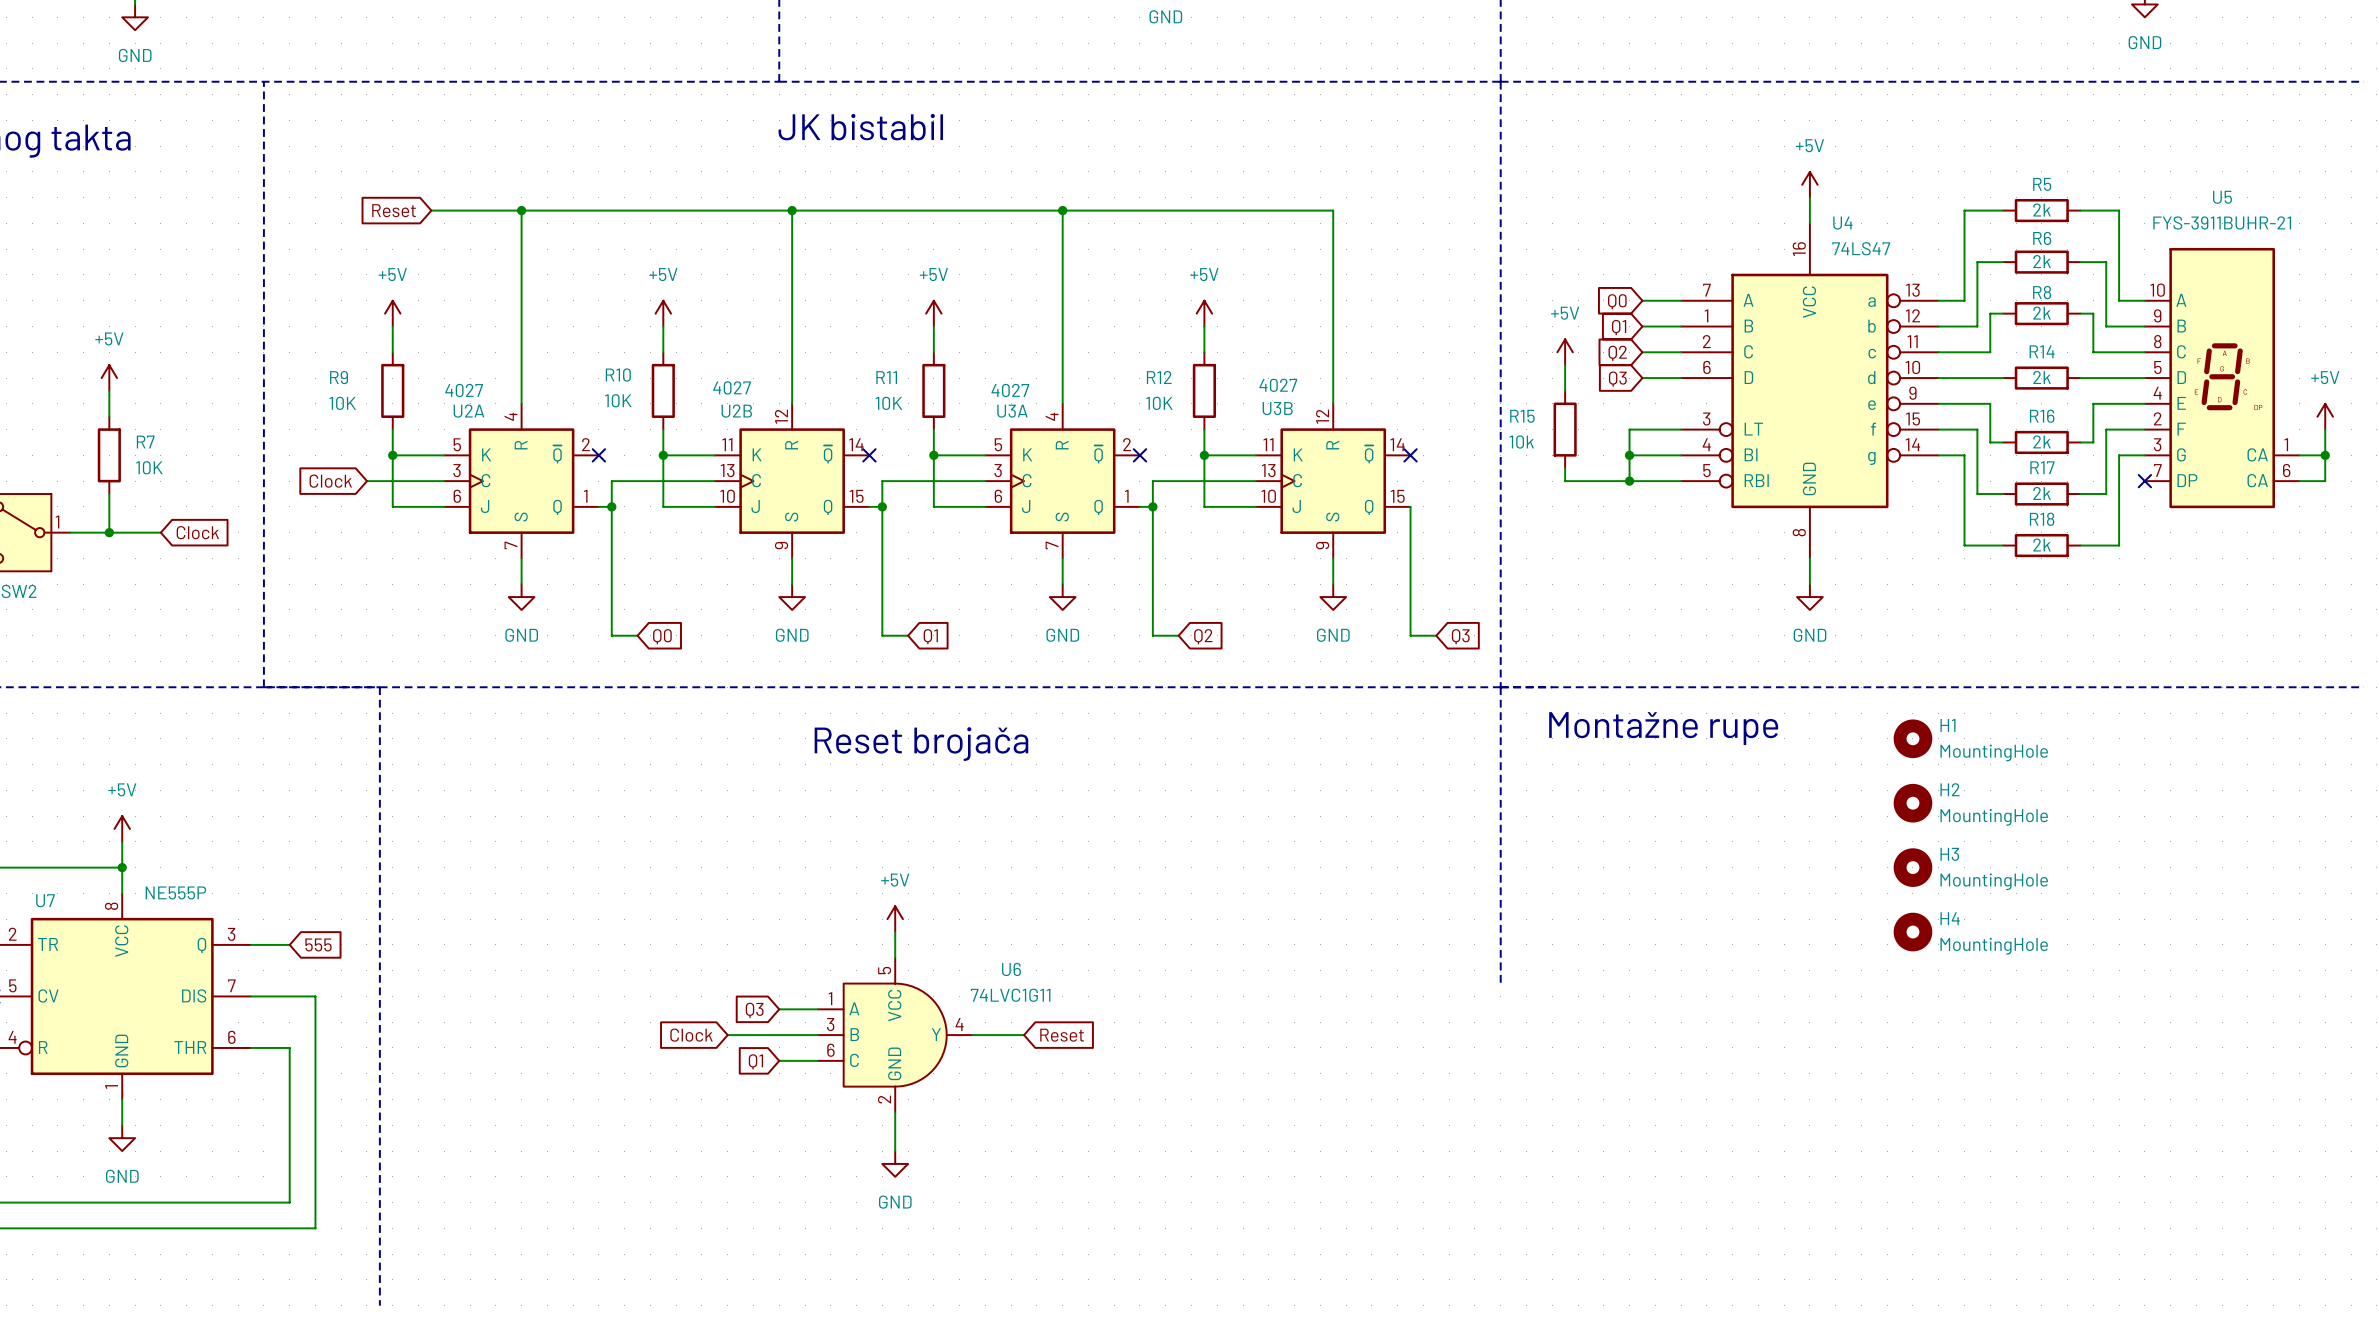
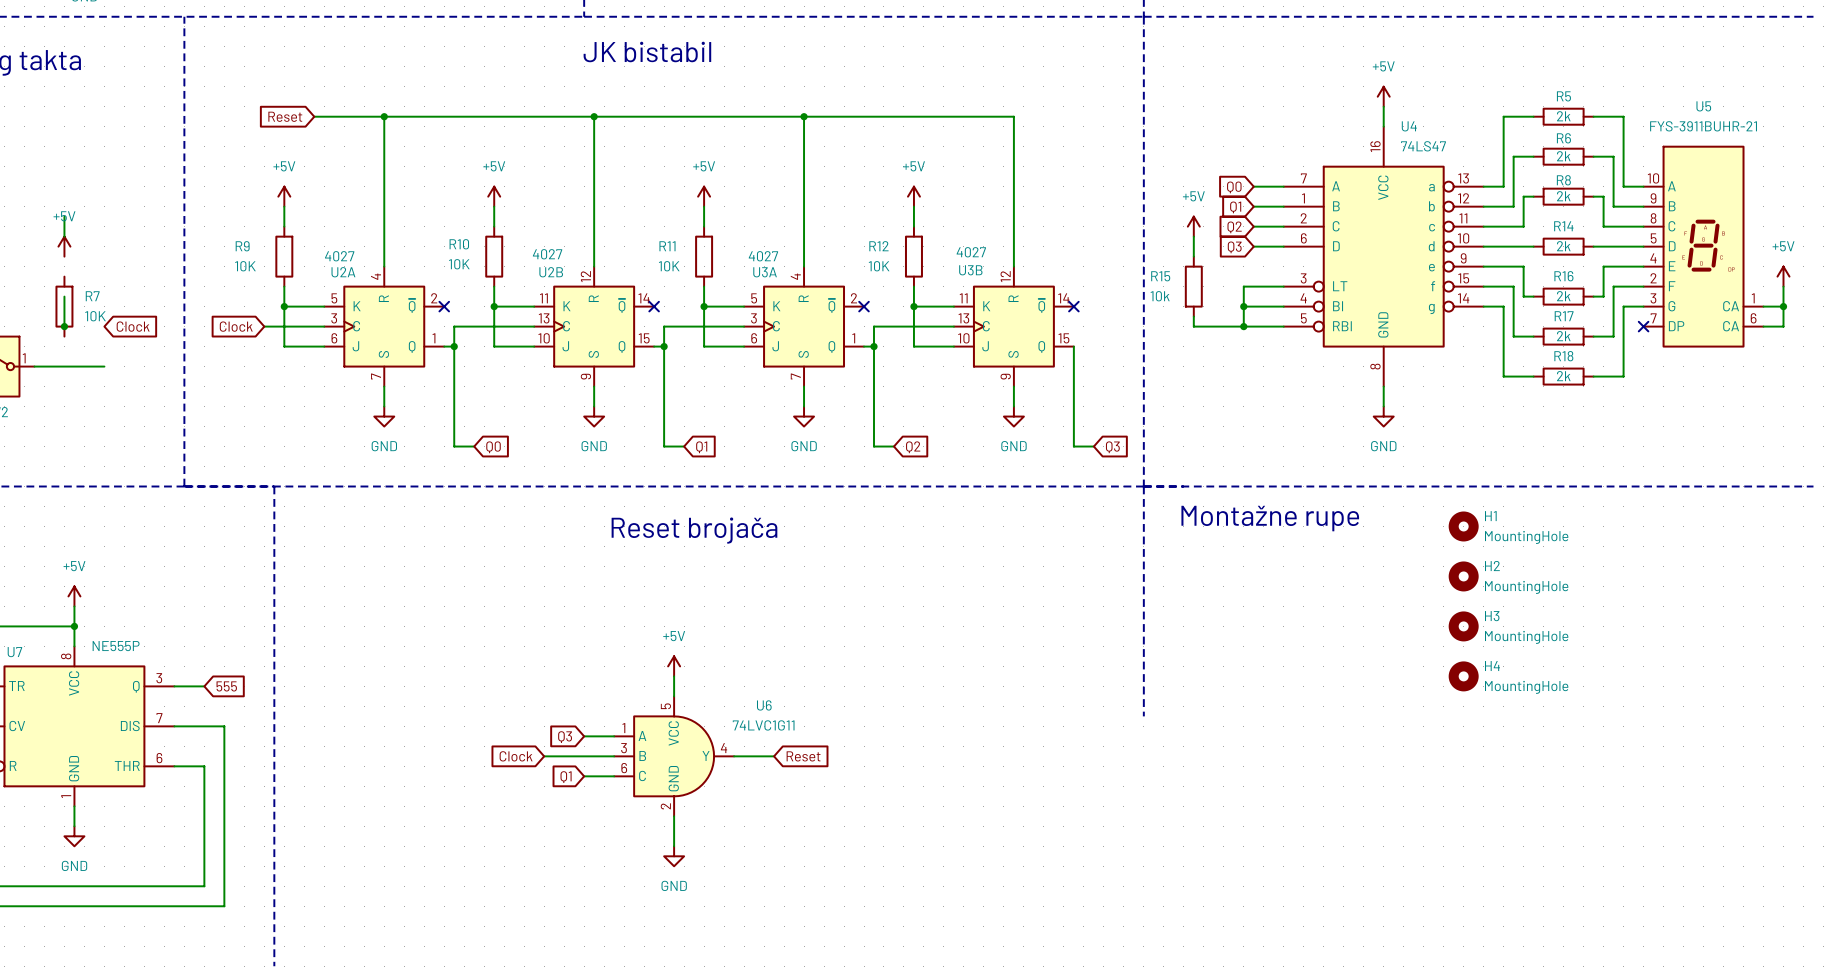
wire: (109, 390) (109, 416) -> (64, 216) (64, 236)
wire: (109, 494) (109, 532) -> (64, 296) (64, 326)
junction position: (109, 532) -> (64, 326)
global label position: Clock (197, 532) -> Clock (133, 326)

